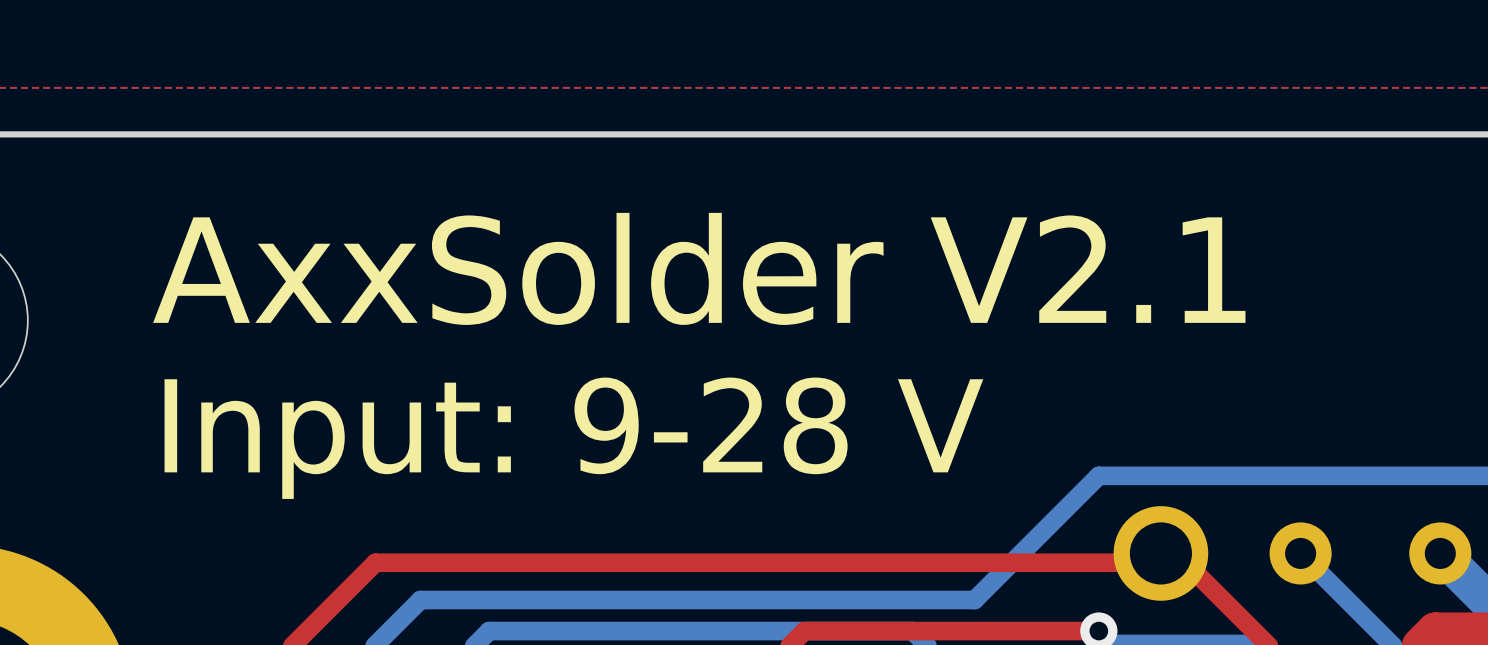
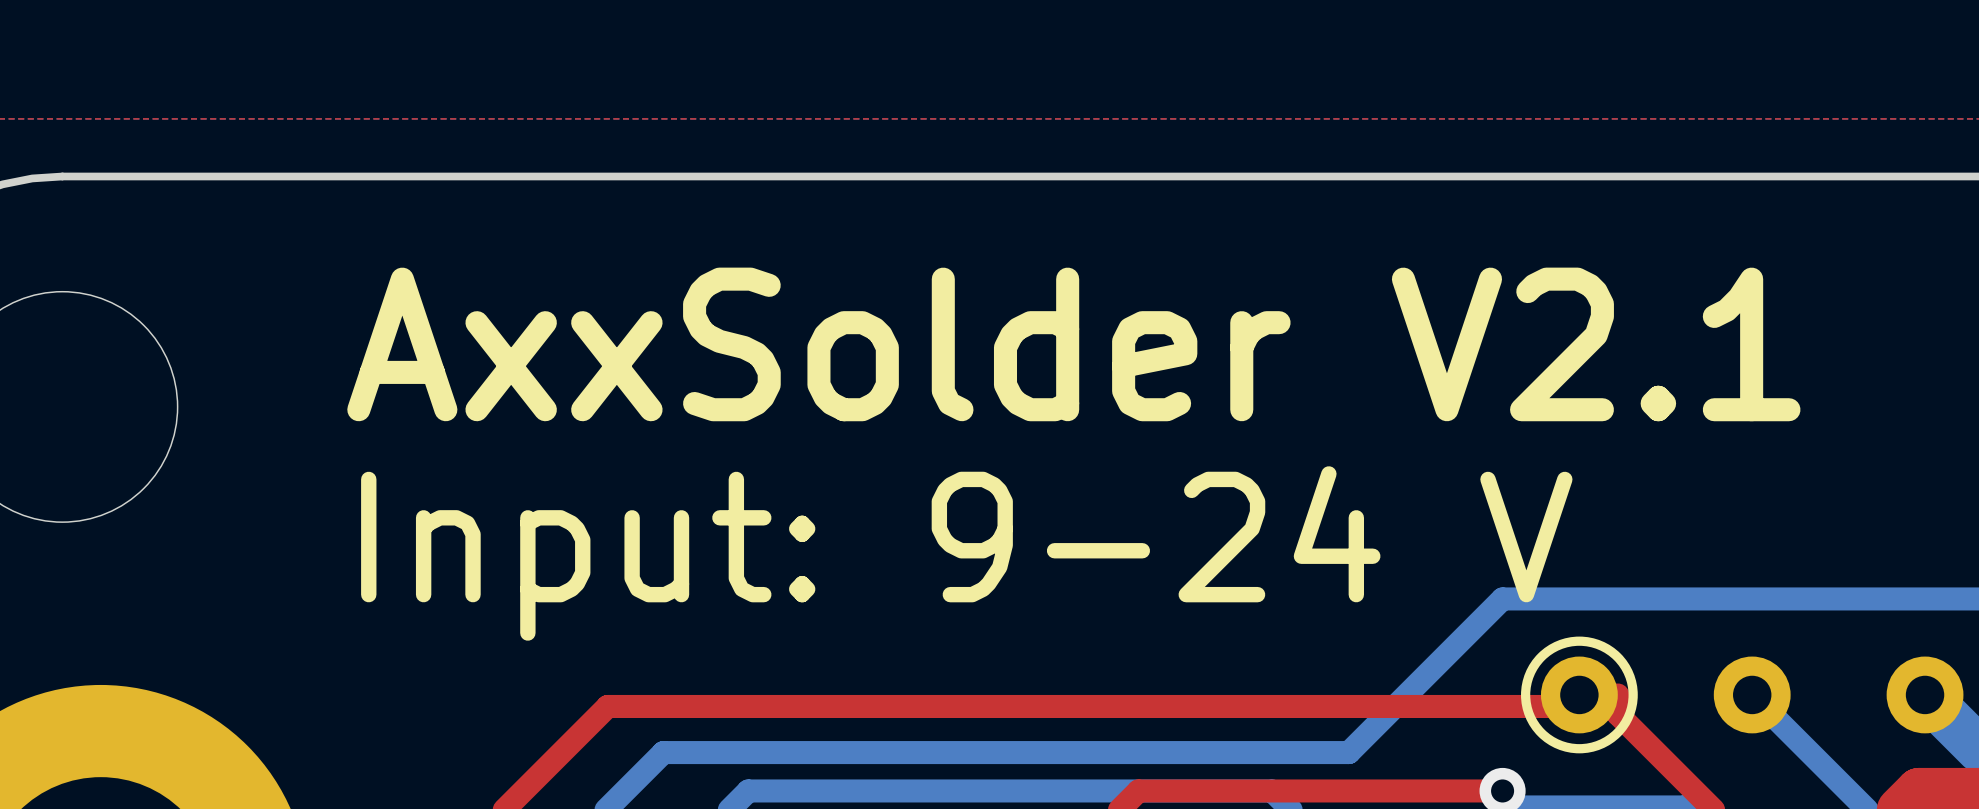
text: Input: 9-28 V (573, 438) -> Input: 9-24 V (966, 553)
part footprint: [1113, 506, 1209, 601] -> [1521, 636, 1638, 754]

